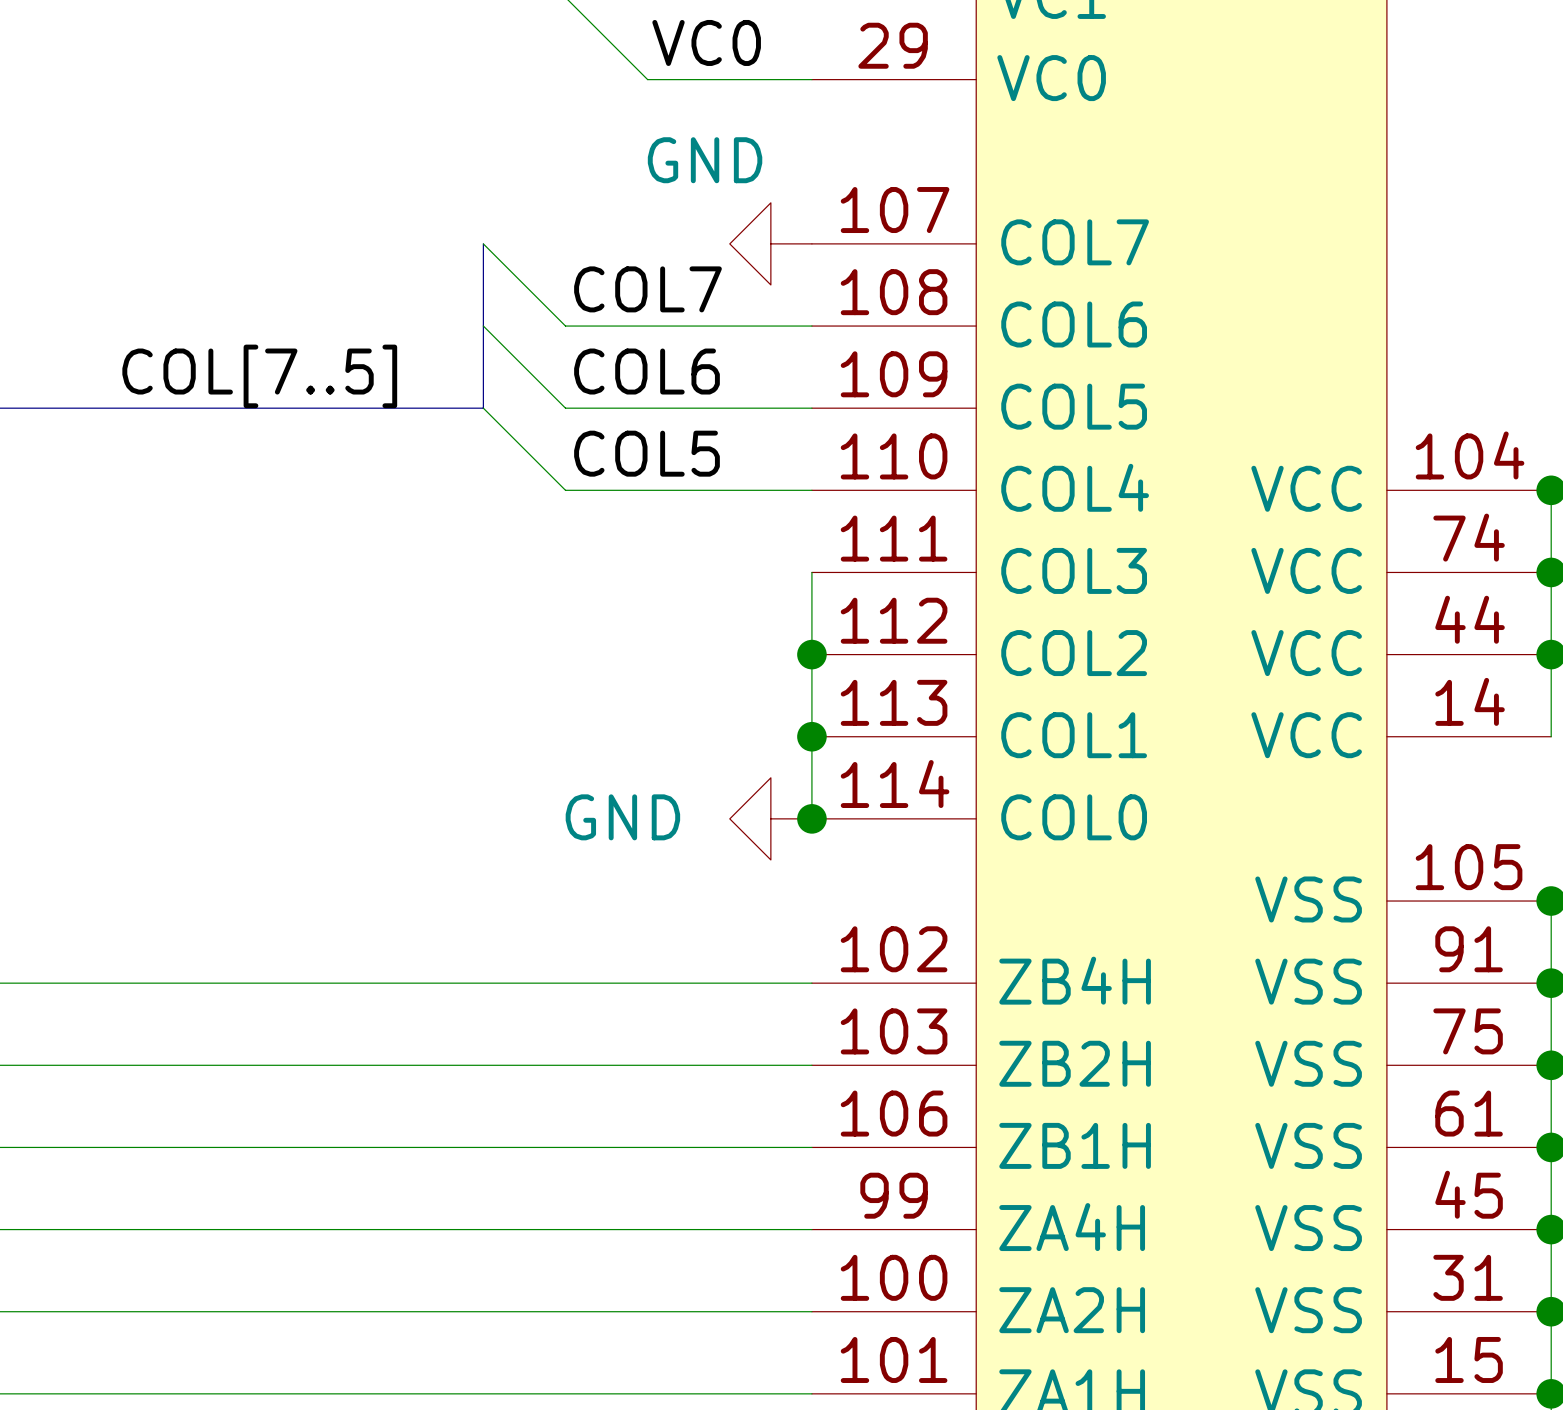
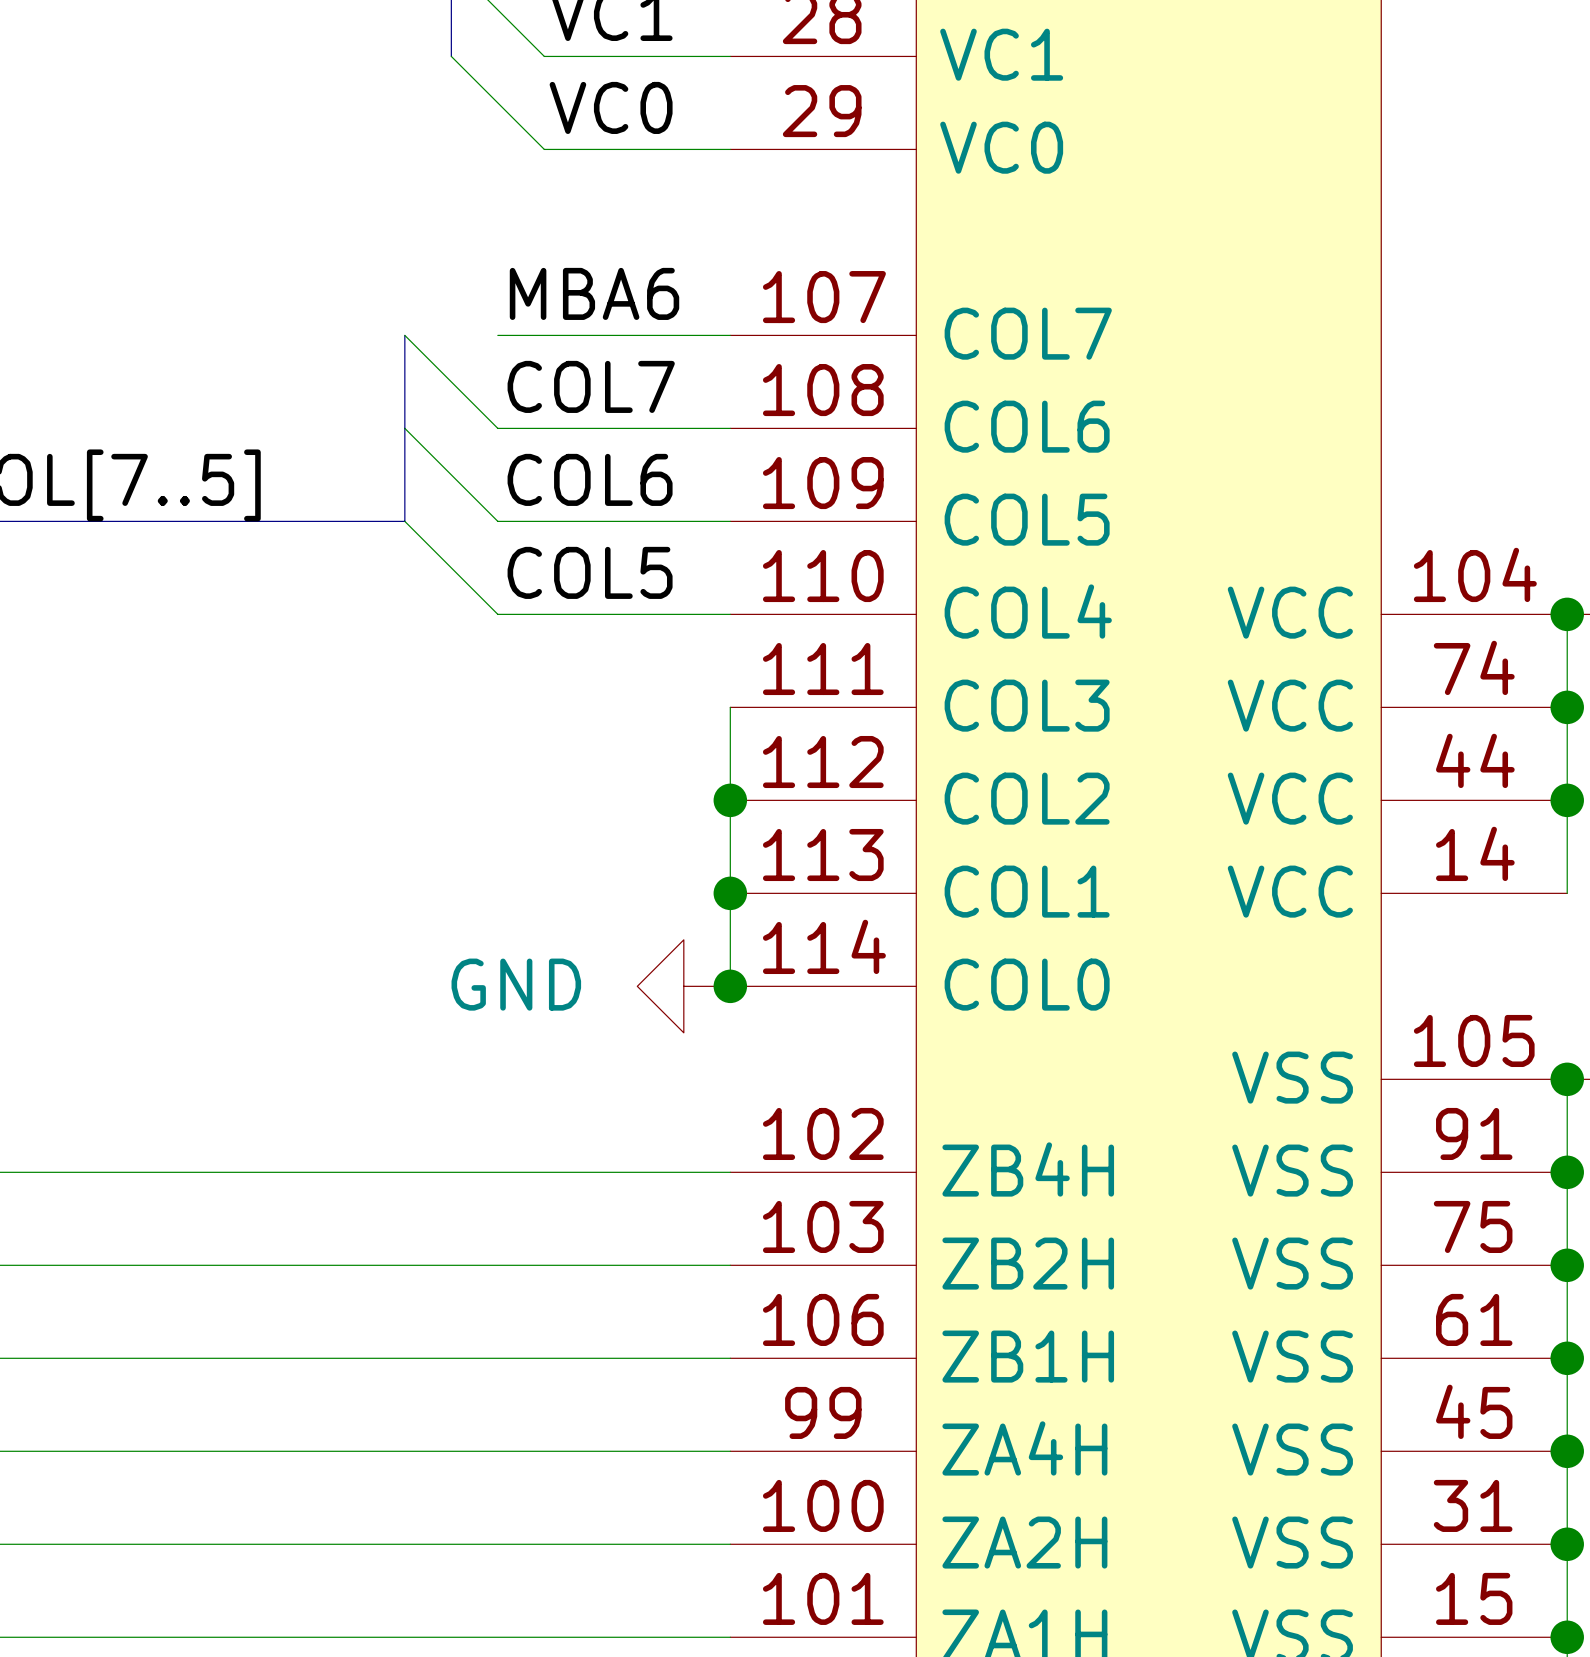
label: none -> MBA6 (594, 293)
wire: (483, 243) (565, 326) (606, 326) -> (404, 335) (497, 428)
bus: (483, 243) (483, 408) -> (404, 335) (404, 521) (358, 521)
wire: none -> (497, 335) (730, 335)
power symbol: GND (770, 243) -> none
label position: COL7 (647, 289) -> COL7 (591, 386)
wire: (483, 326) (565, 408) (606, 408) -> (404, 428) (497, 521)
label position: COL6 (646, 371) -> COL6 (590, 479)
wire: (483, 408) (565, 490) (606, 490) -> (404, 521) (497, 614)
label position: COL5 (646, 453) -> COL5 (590, 572)

